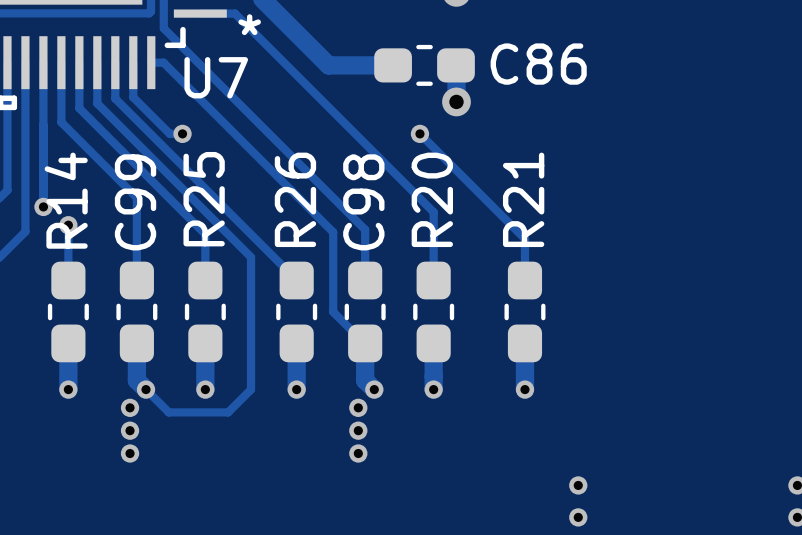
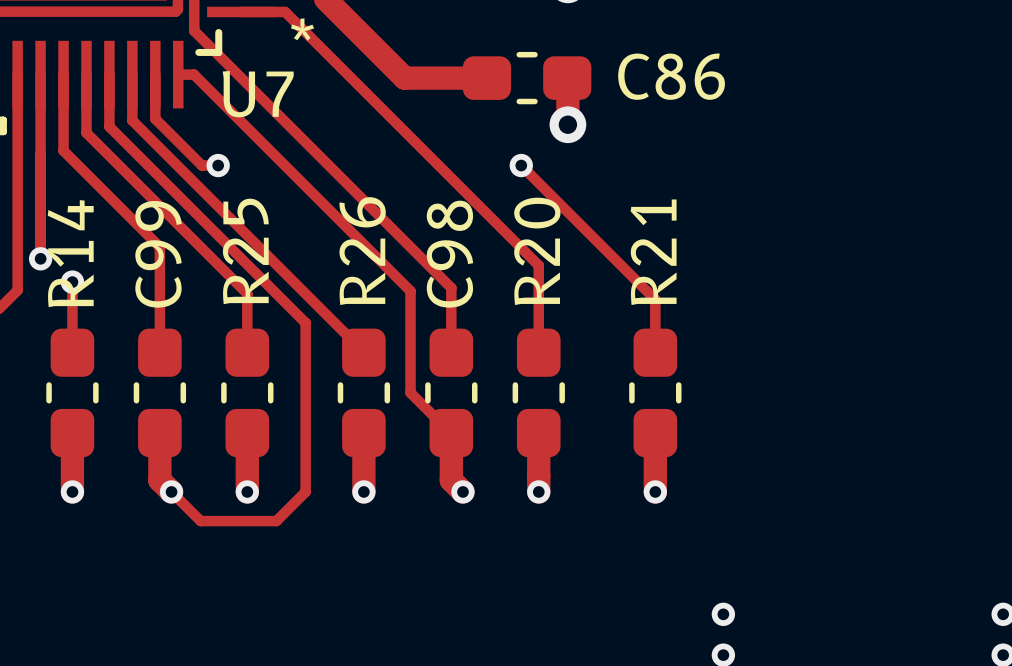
via: (130, 407) -> none
via: (358, 407) -> none
via: (130, 430) -> none
via: (358, 430) -> none
via: (130, 453) -> none
via: (358, 453) -> none

